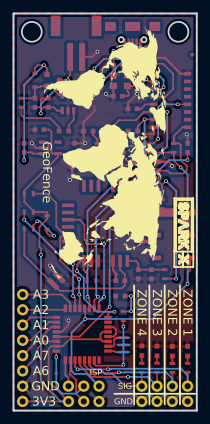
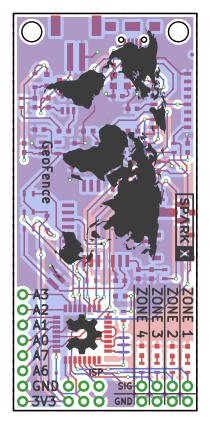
drawing shape: [174, 198, 194, 268] -> [175, 193, 195, 262]
drawing: none -> [65, 314, 102, 355]

